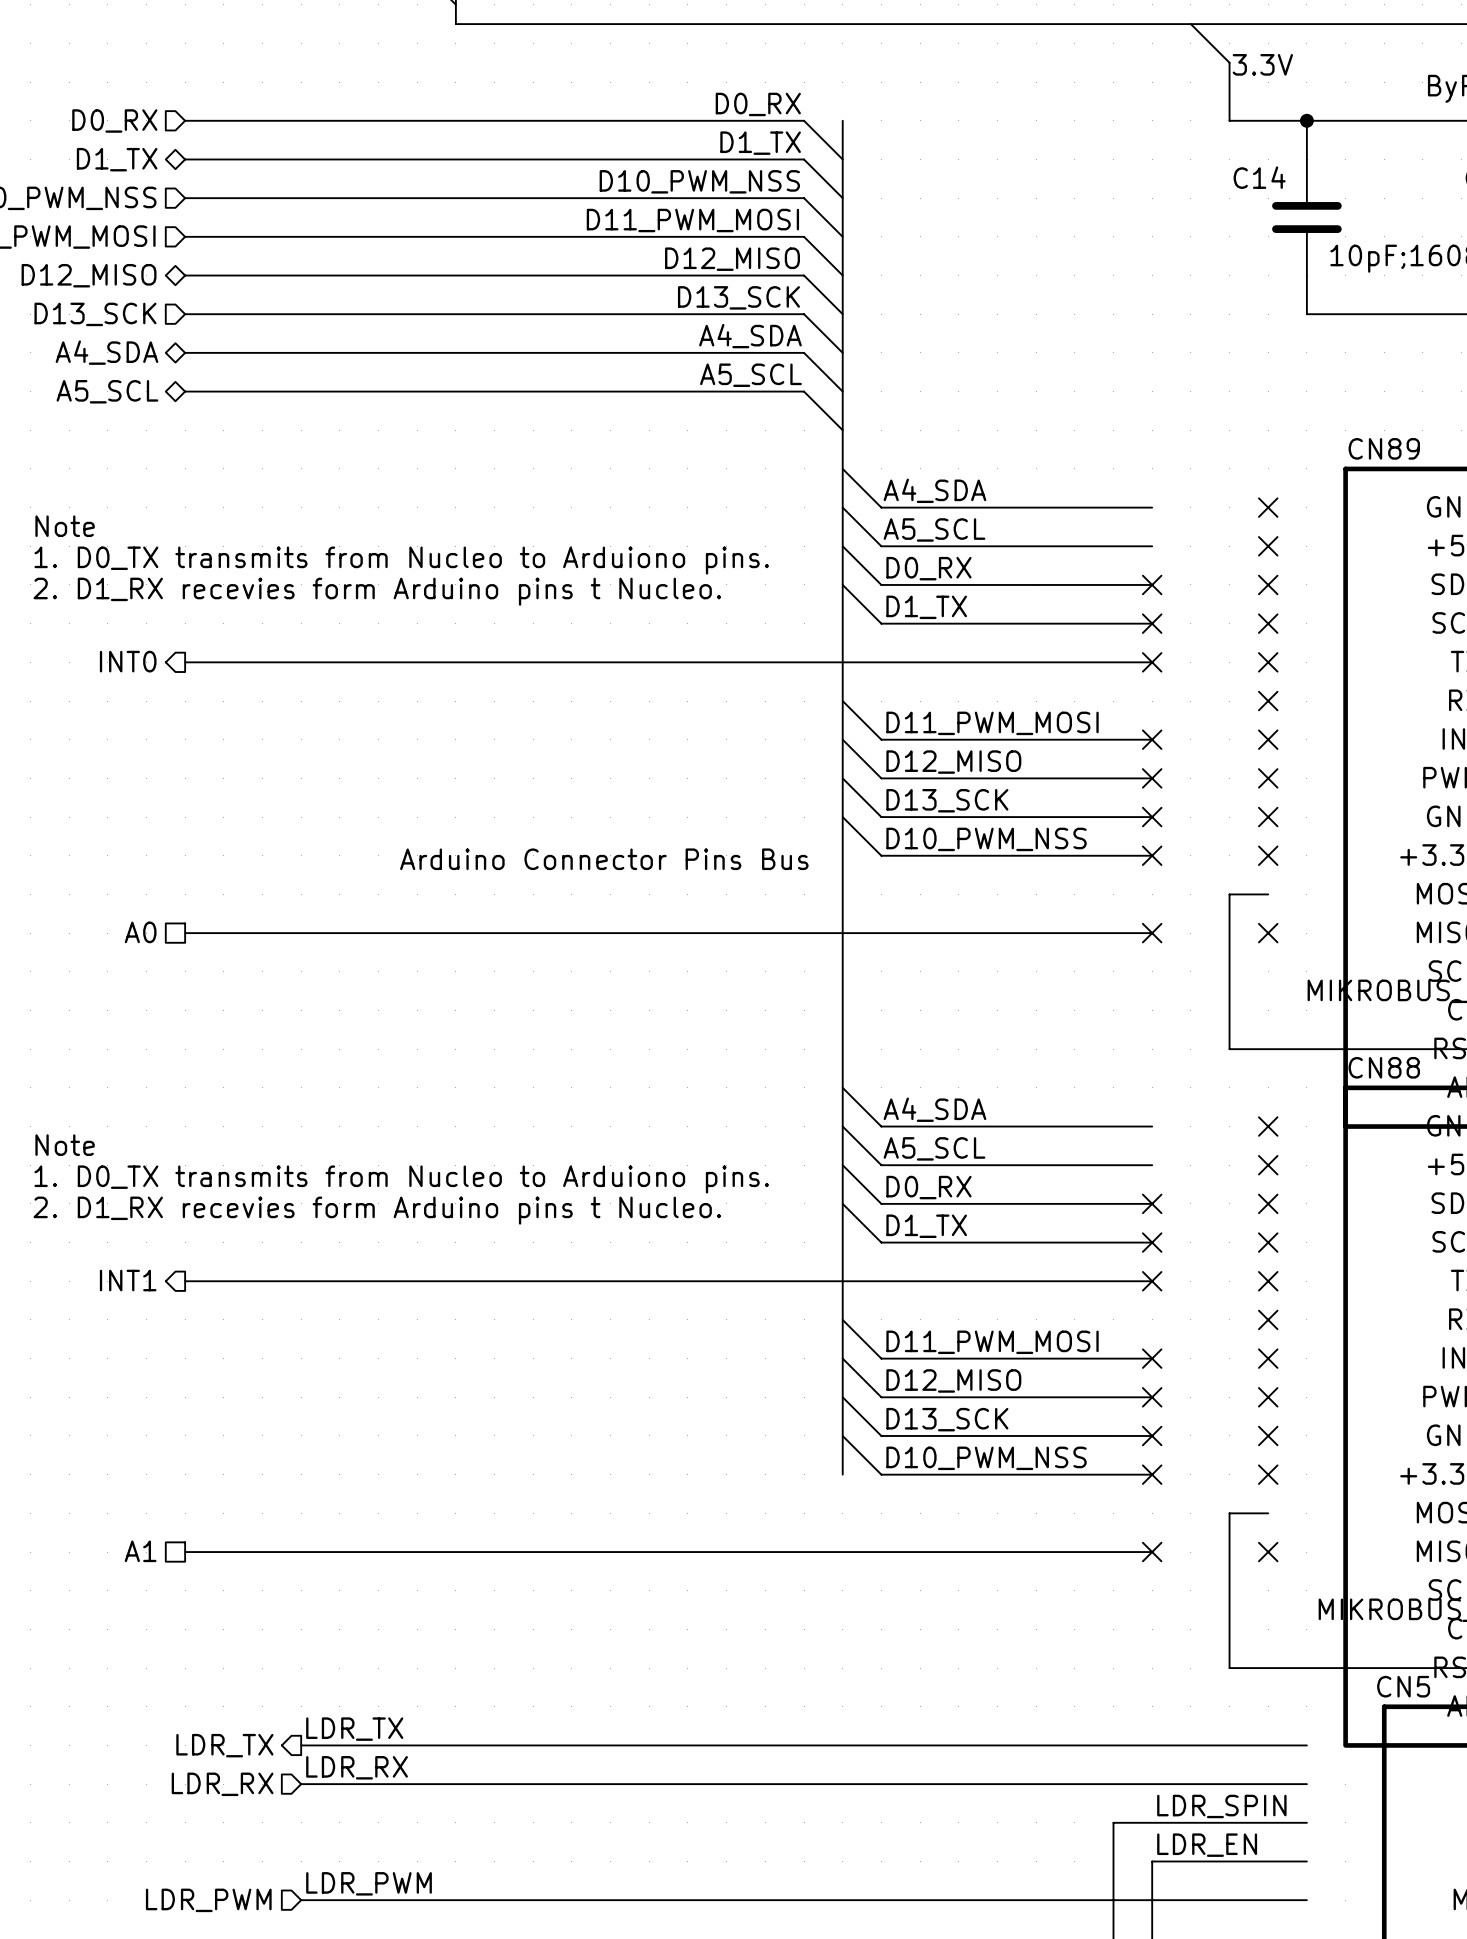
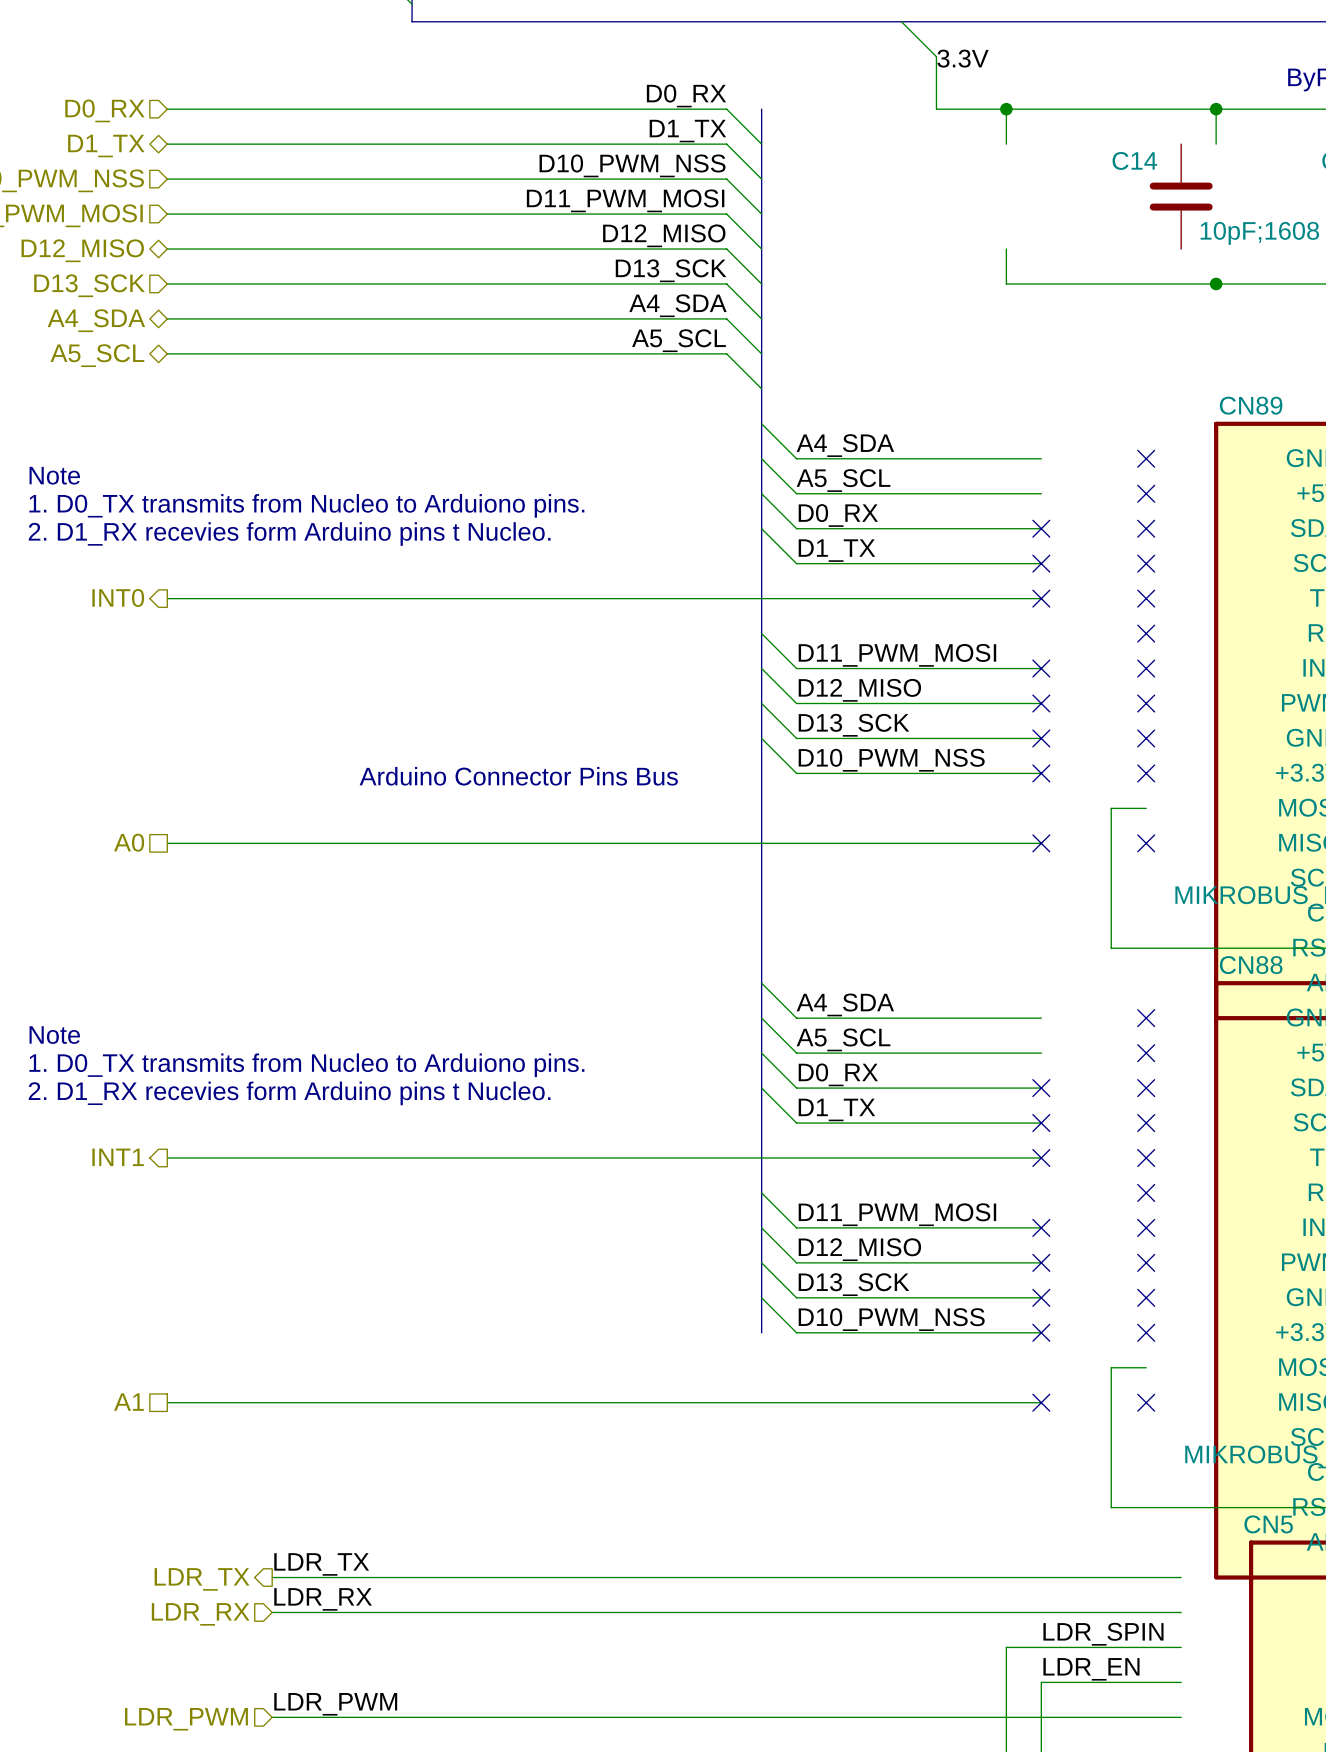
wire: (1190, 24) (1229, 62) (1229, 120) -> (901, 21) (936, 56) (936, 109) (1111, 109)
label position: 3.3V (1262, 64) -> 3.3V (963, 58)
wire: none -> (1006, 109) (1006, 144)
junction: none -> (1006, 109)
wire: (1306, 120) (1306, 159) -> (1216, 109) (1216, 144)
junction position: (1306, 120) -> (1216, 109)
wire: (1306, 275) (1306, 314) -> (1006, 249) (1006, 283) (1181, 283)
junction: none -> (1216, 283)

